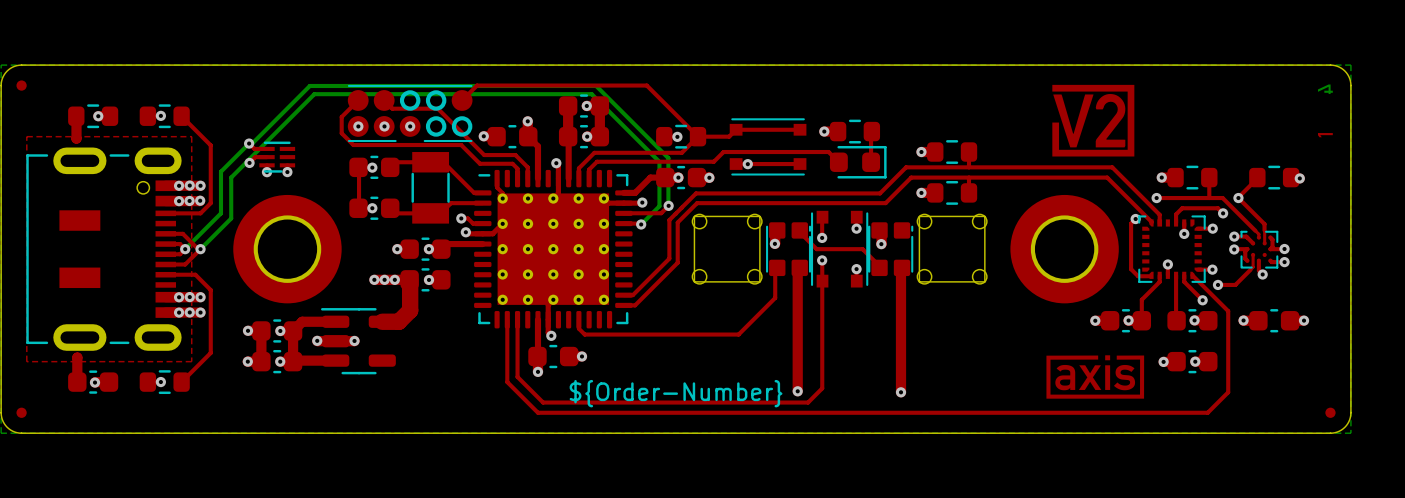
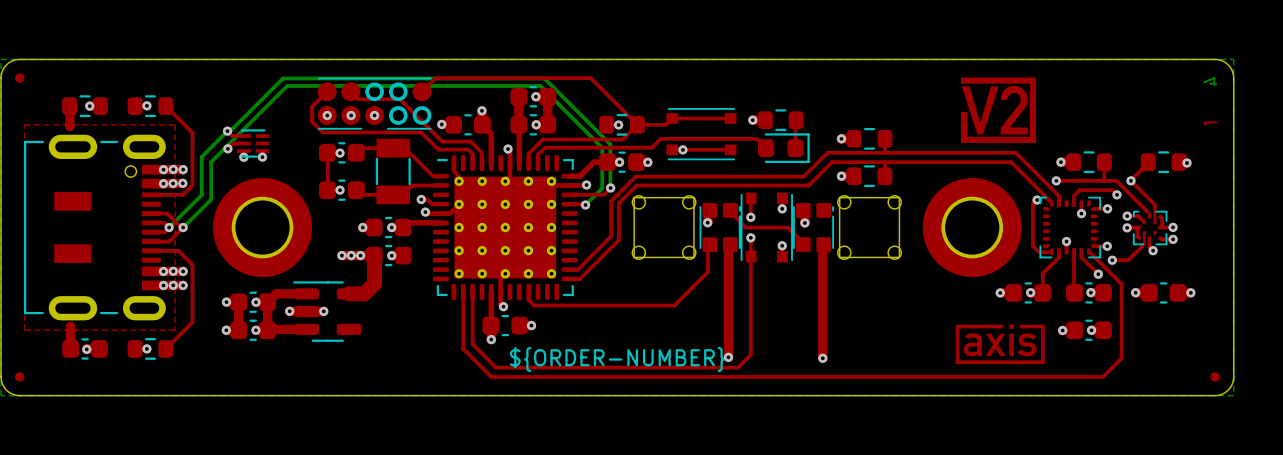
drawing shape: [569, 379, 783, 408] -> [509, 346, 725, 373]

